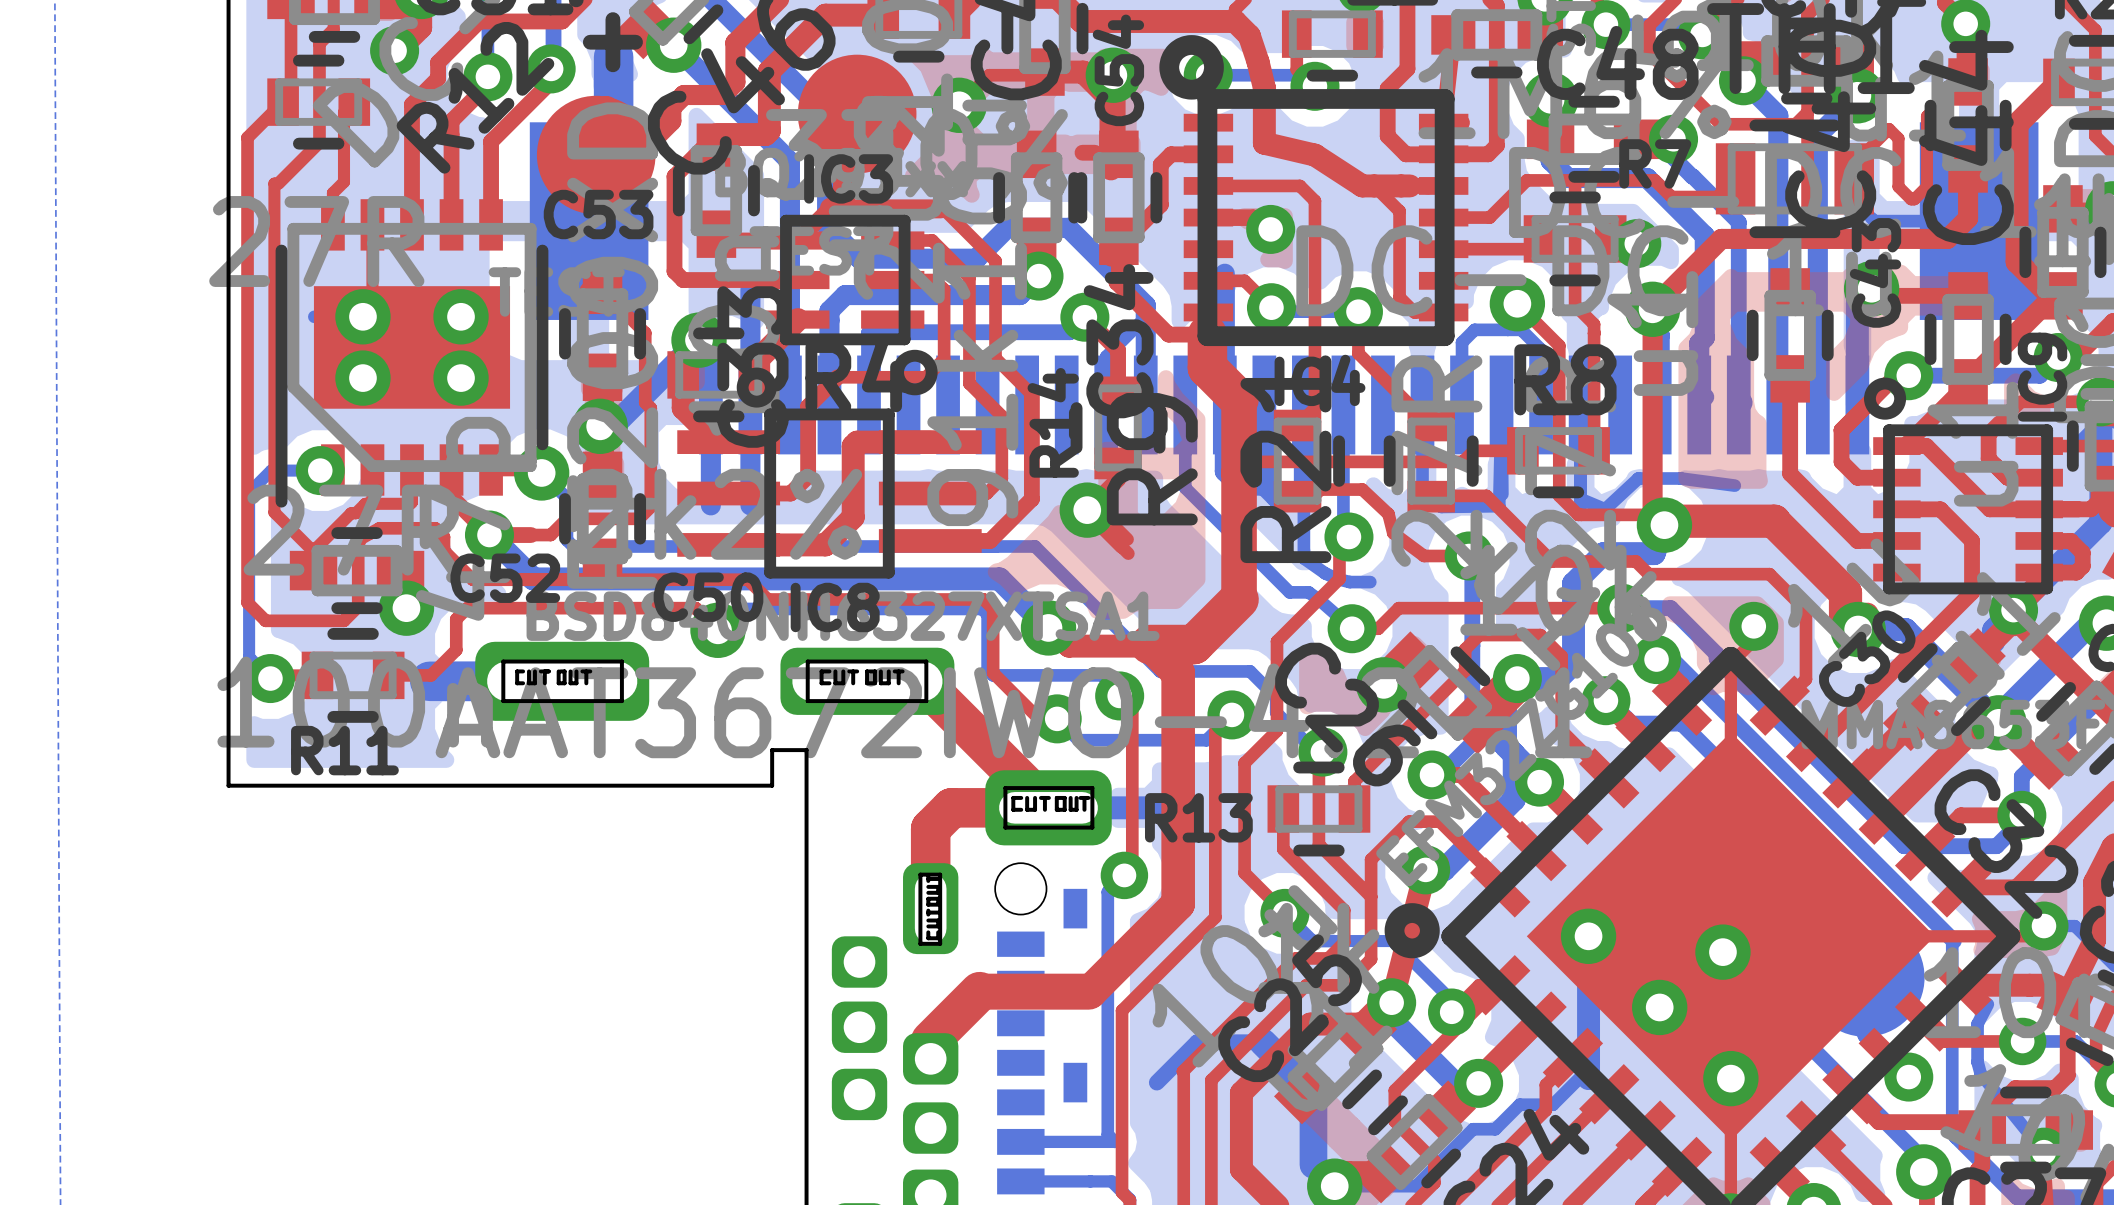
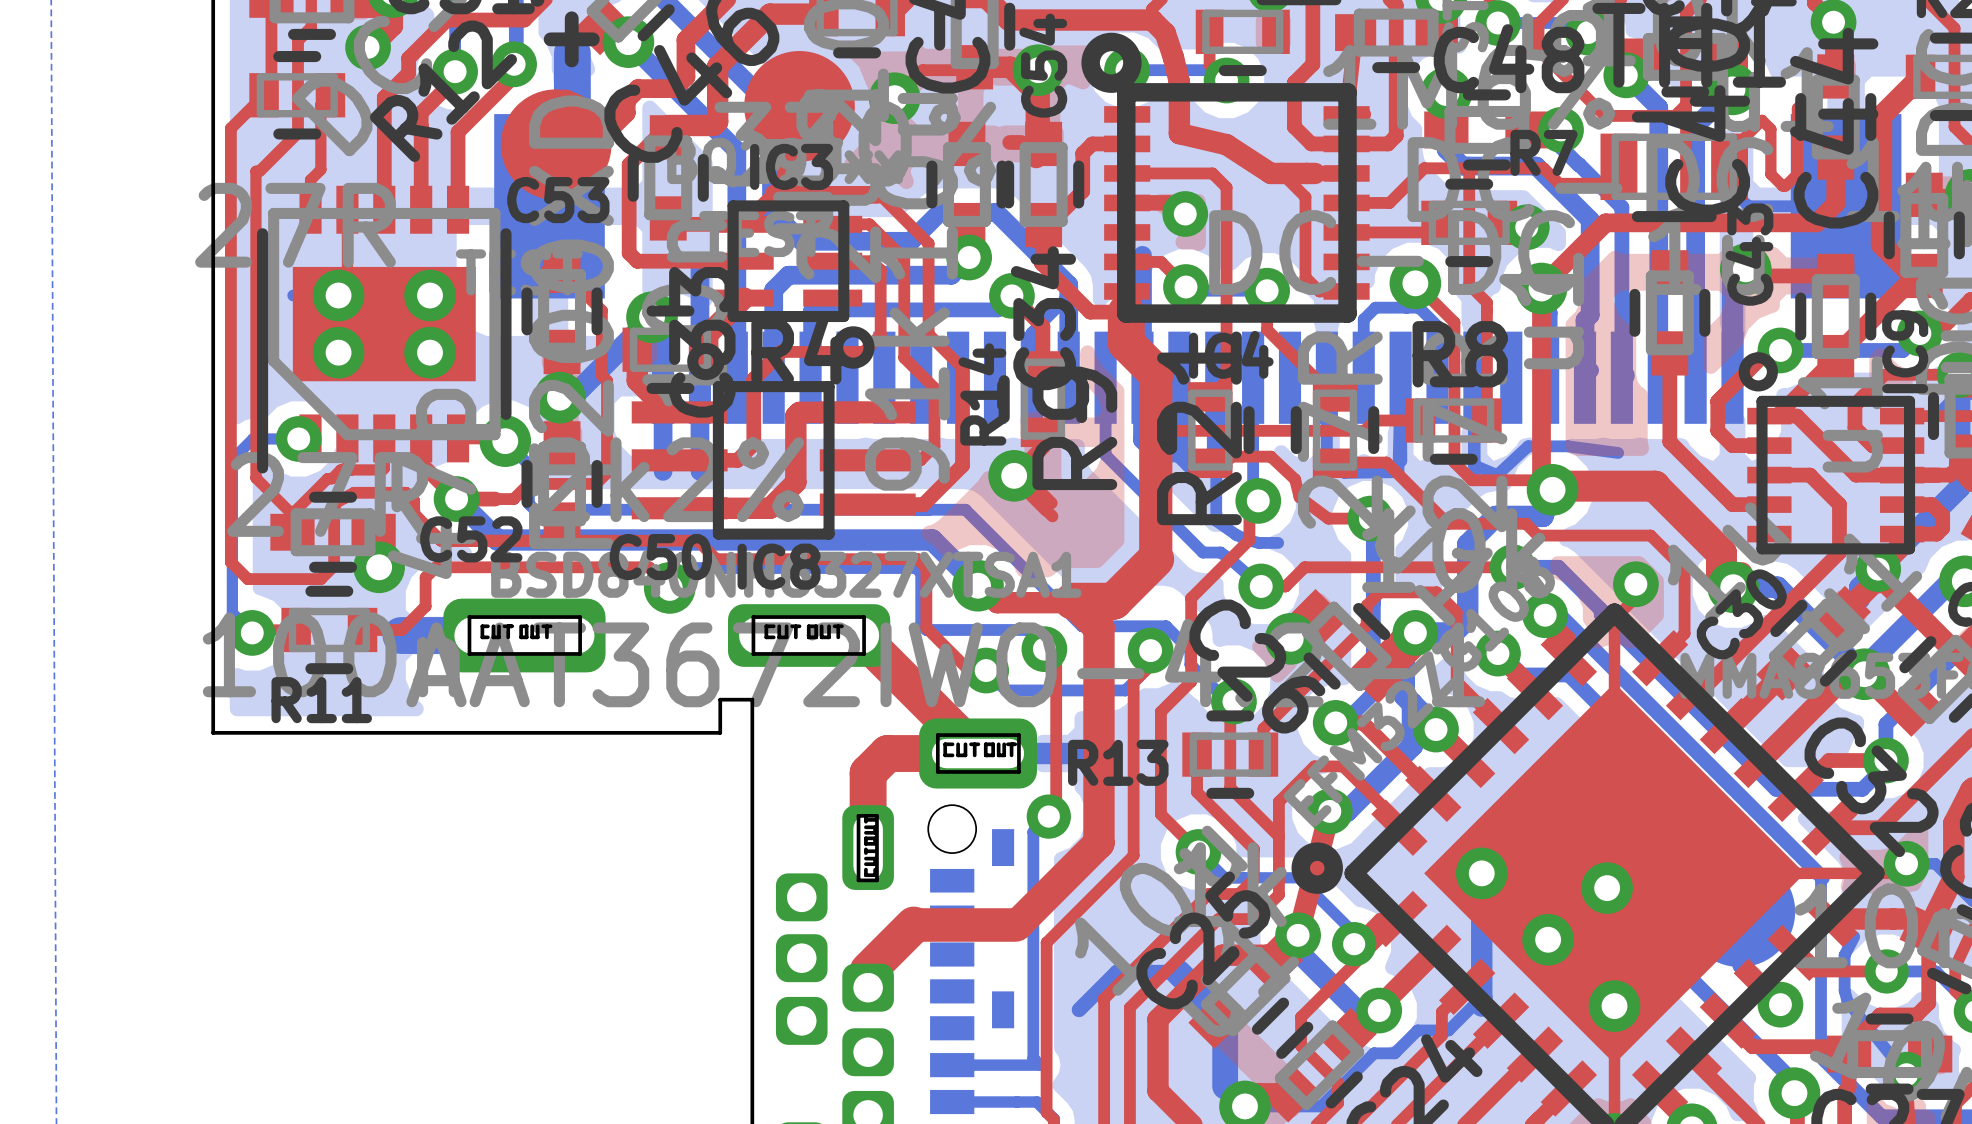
via position: (1231, 714) -> (1150, 650)

